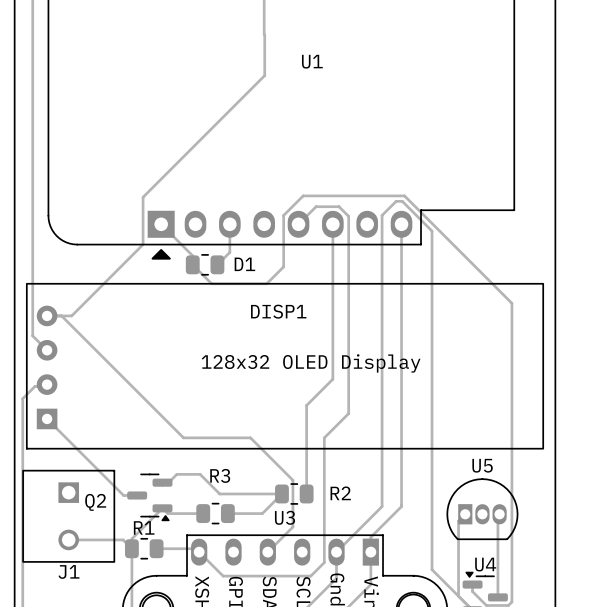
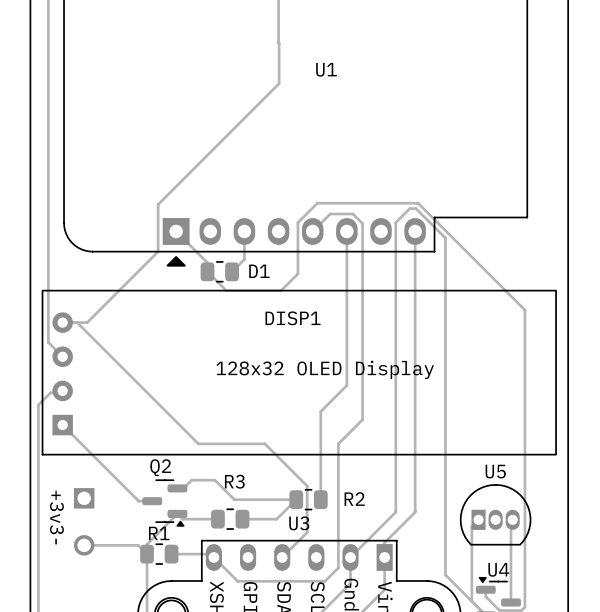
Q2 name position: Q2 (95, 502) -> Q2 (160, 467)
text: none -> +3v3- (56, 517)
J1 side: top (68, 516) -> bottom (84, 521)

